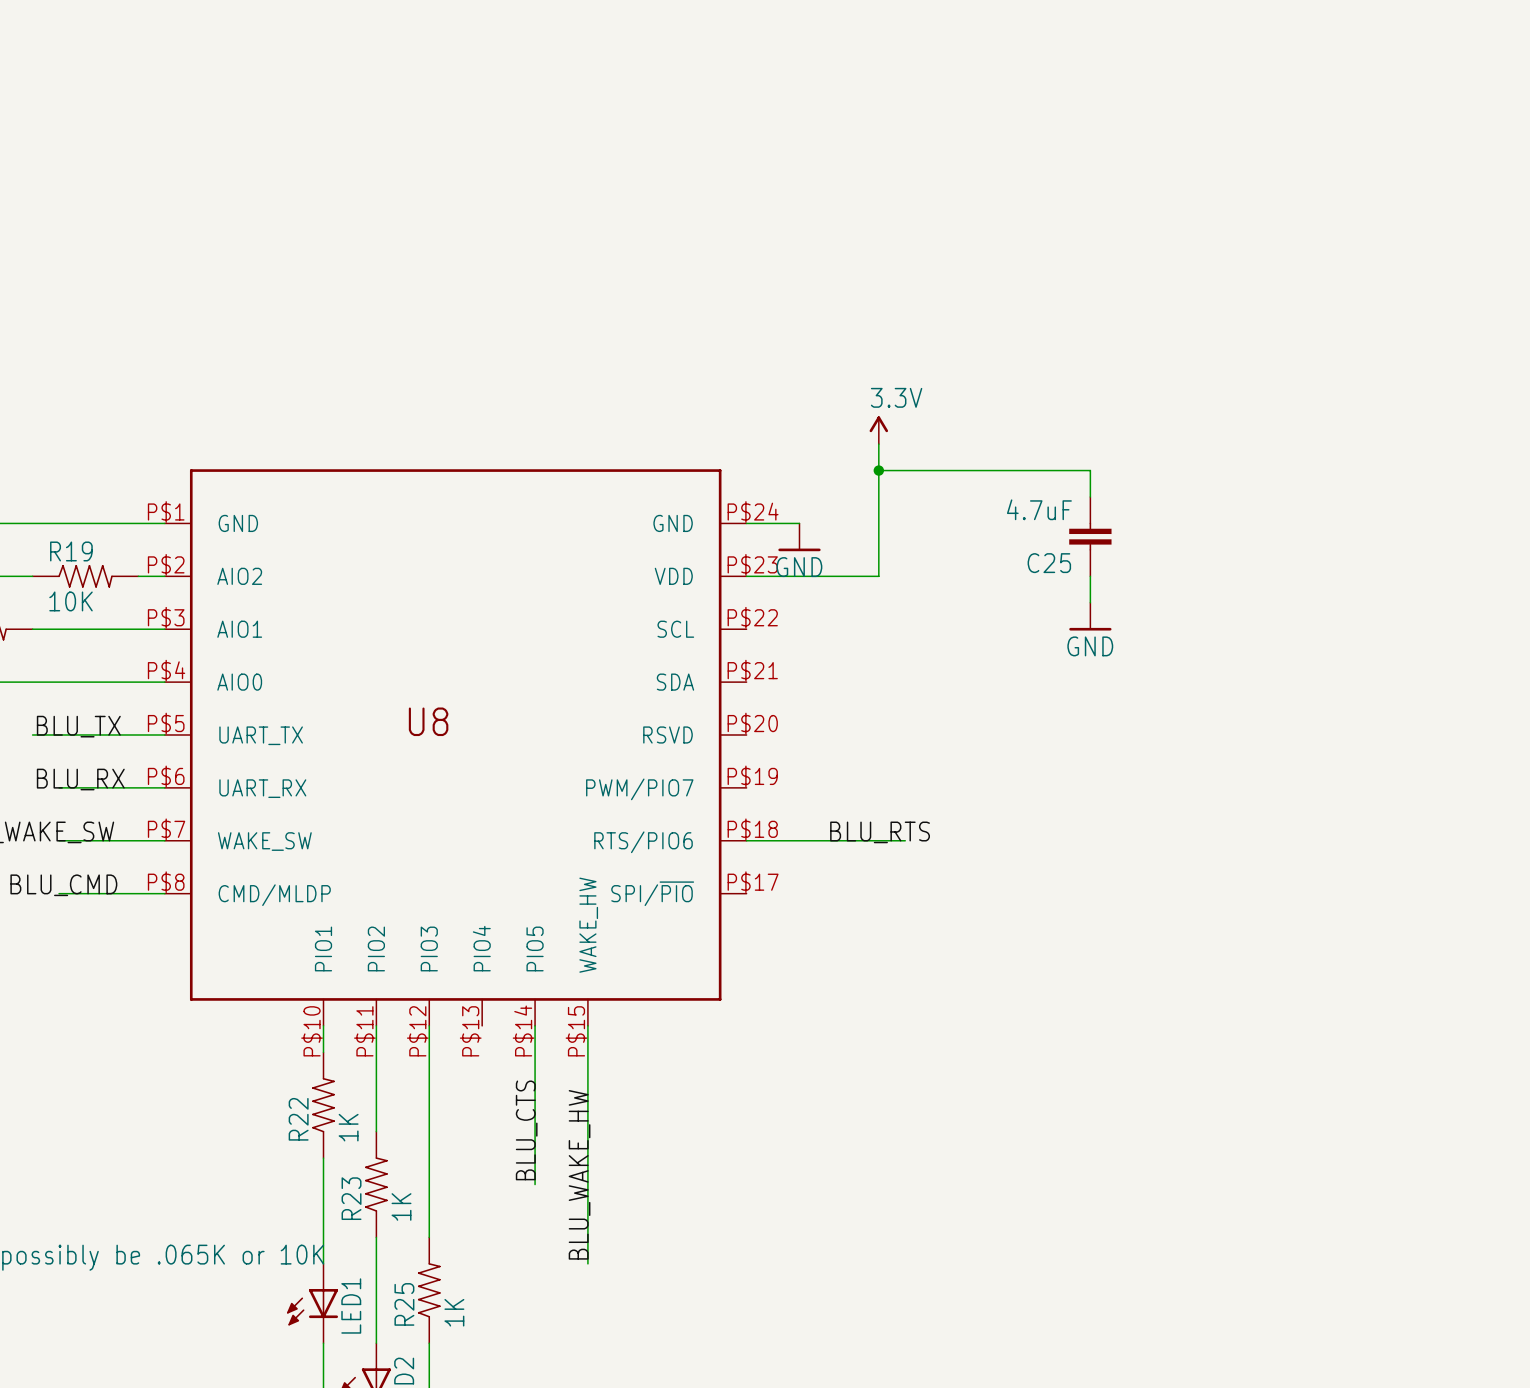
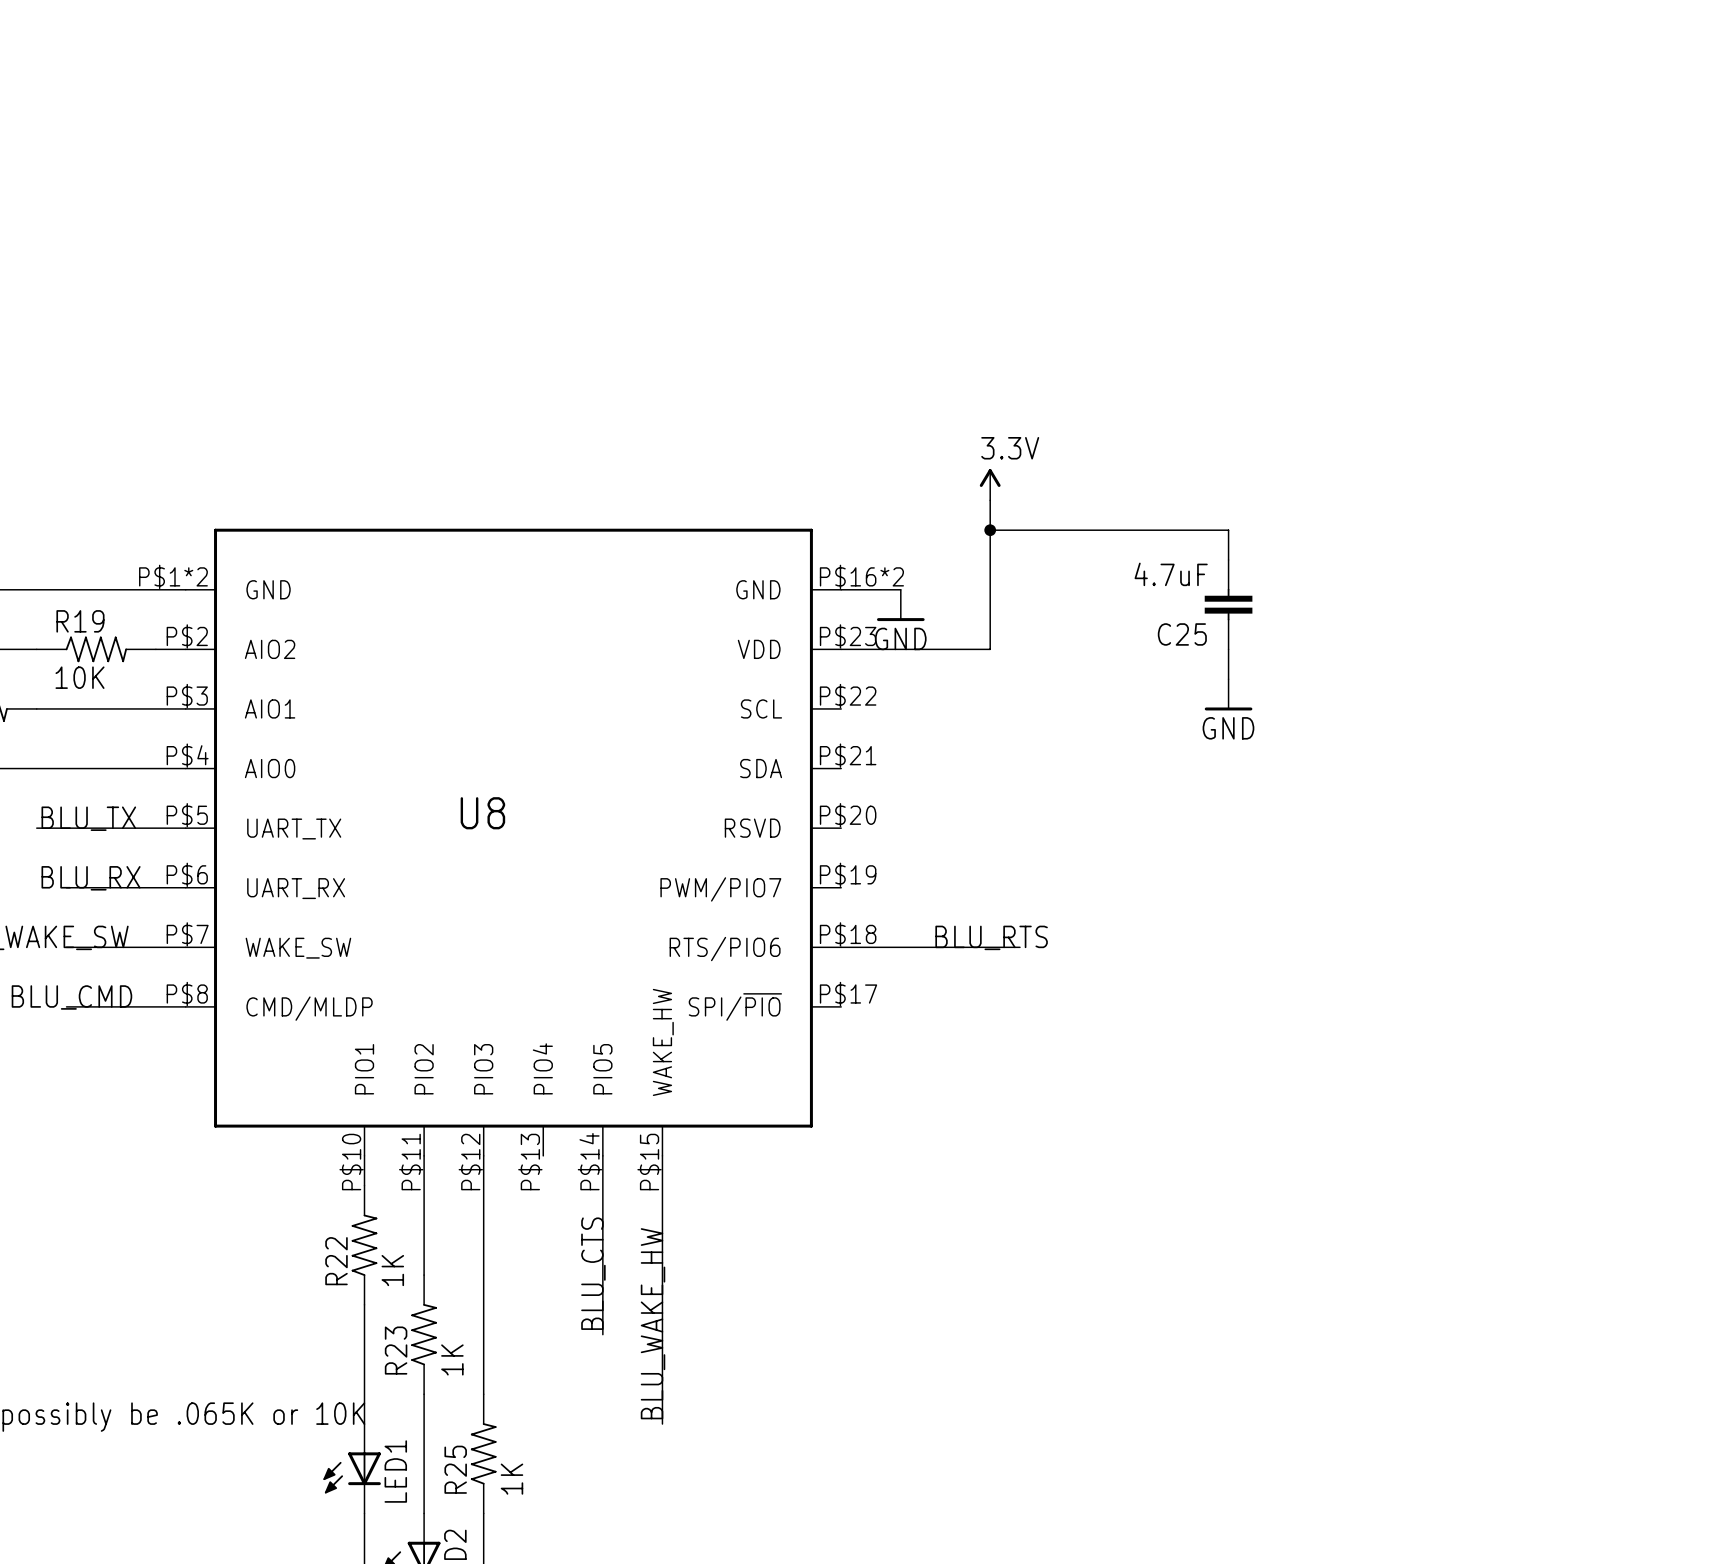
U8 pin number: P$1 (166, 511) -> P$1*2 (173, 576)
U8 pin number: P$24 (753, 511) -> P$16*2 (861, 576)

